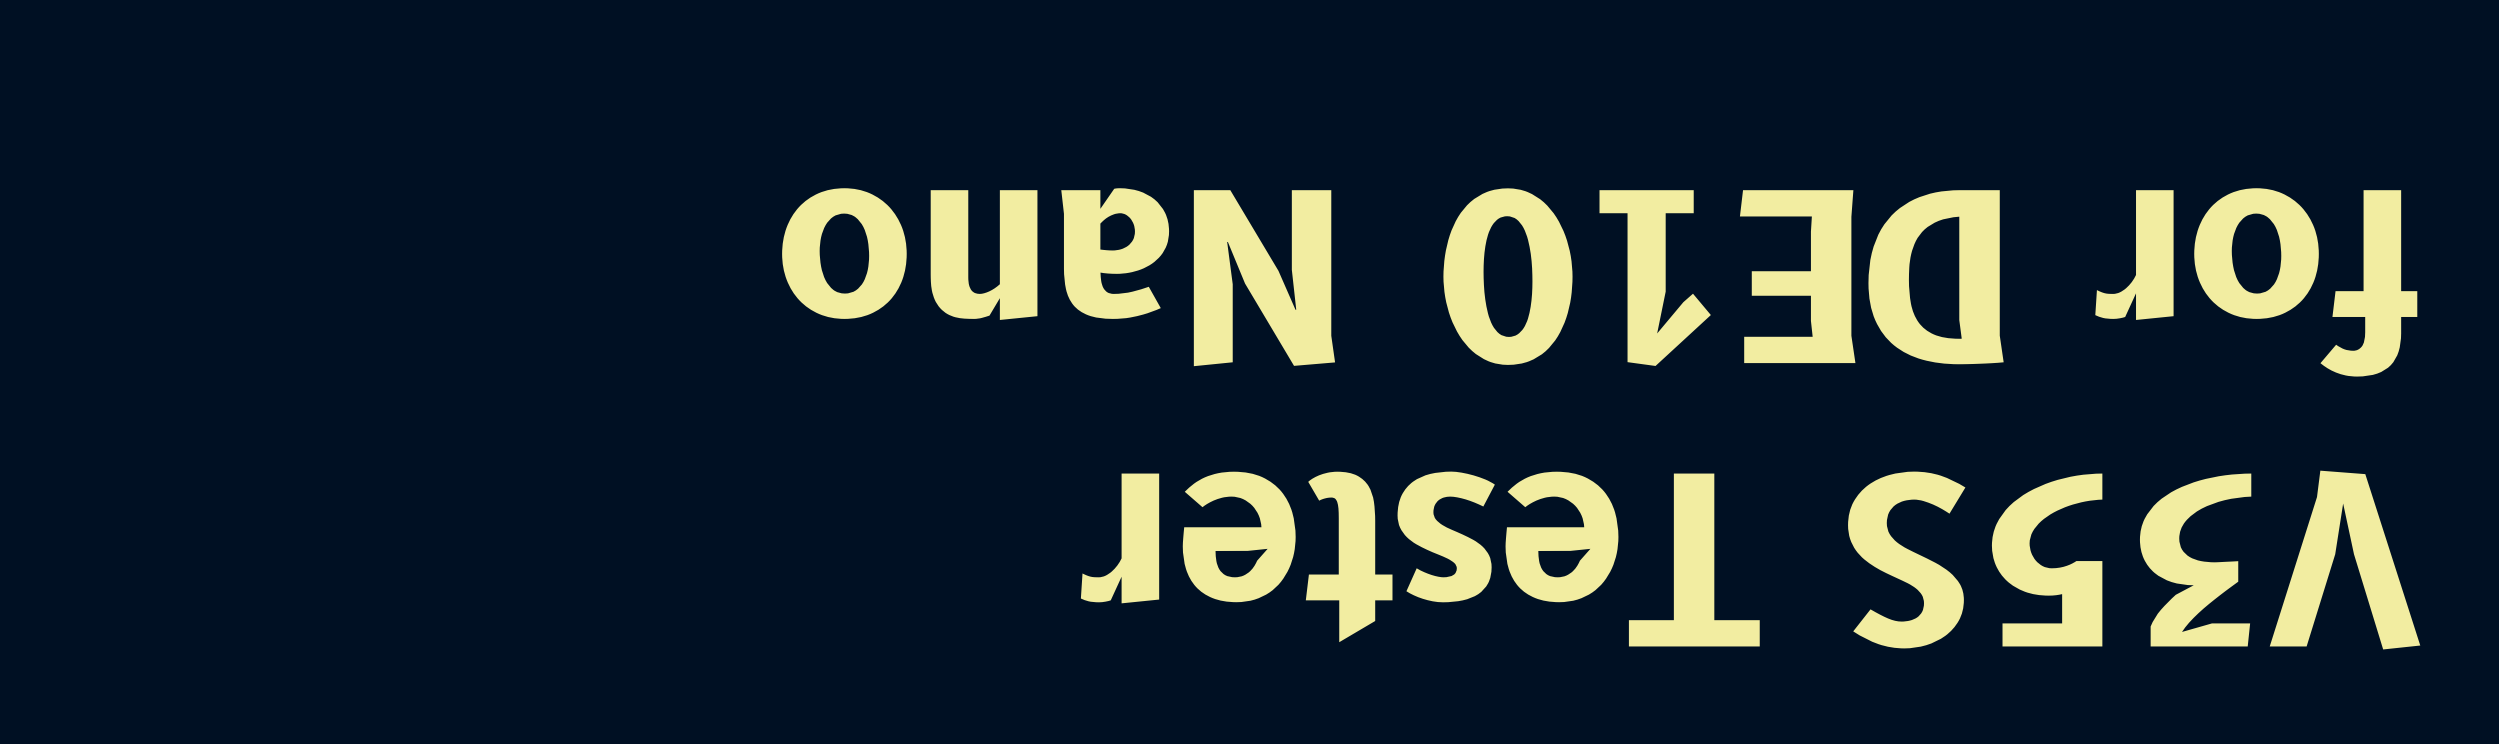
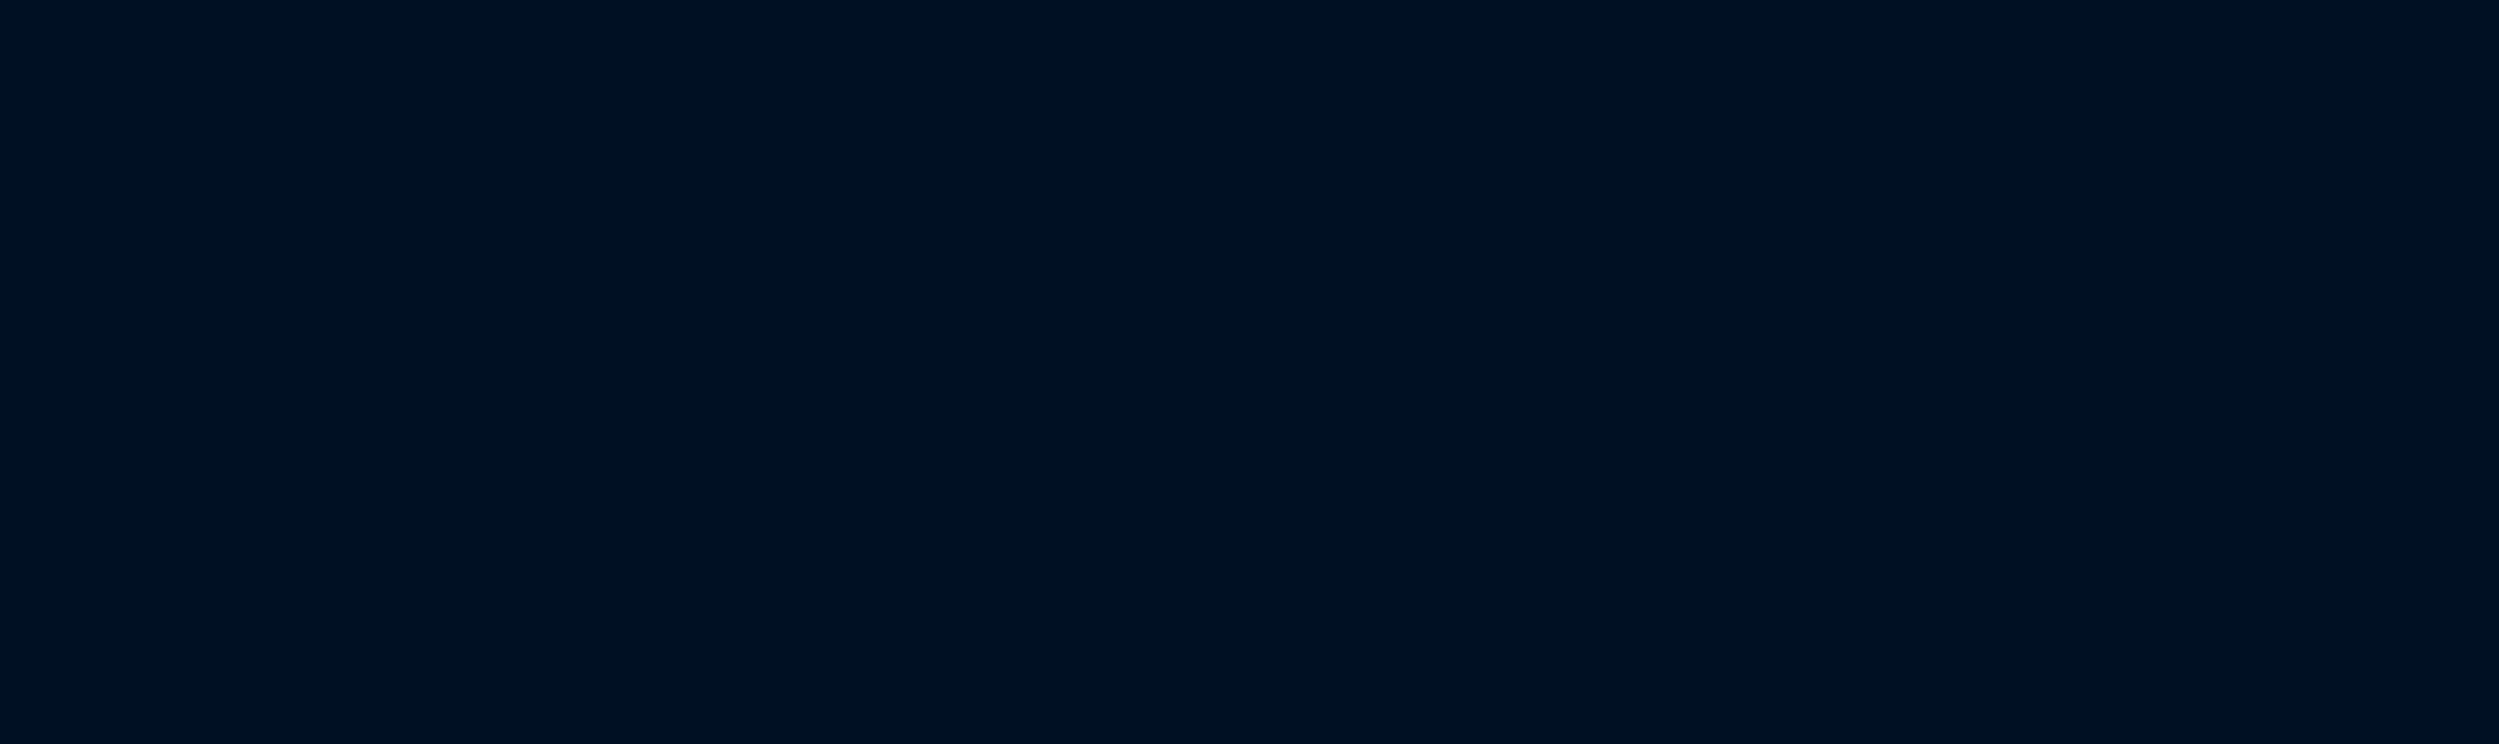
text: for DE10 Nano (1599, 282) -> none
text: V35S Tester (1750, 560) -> none

